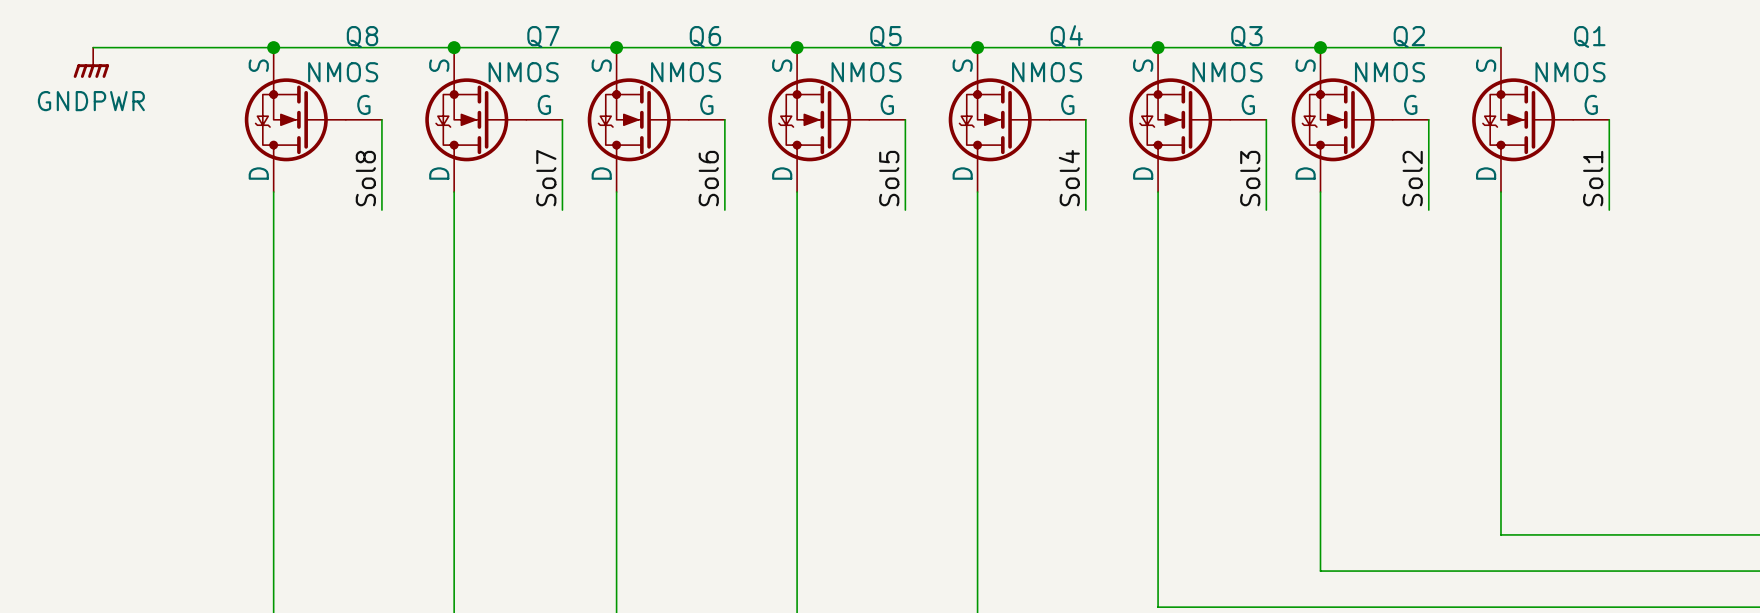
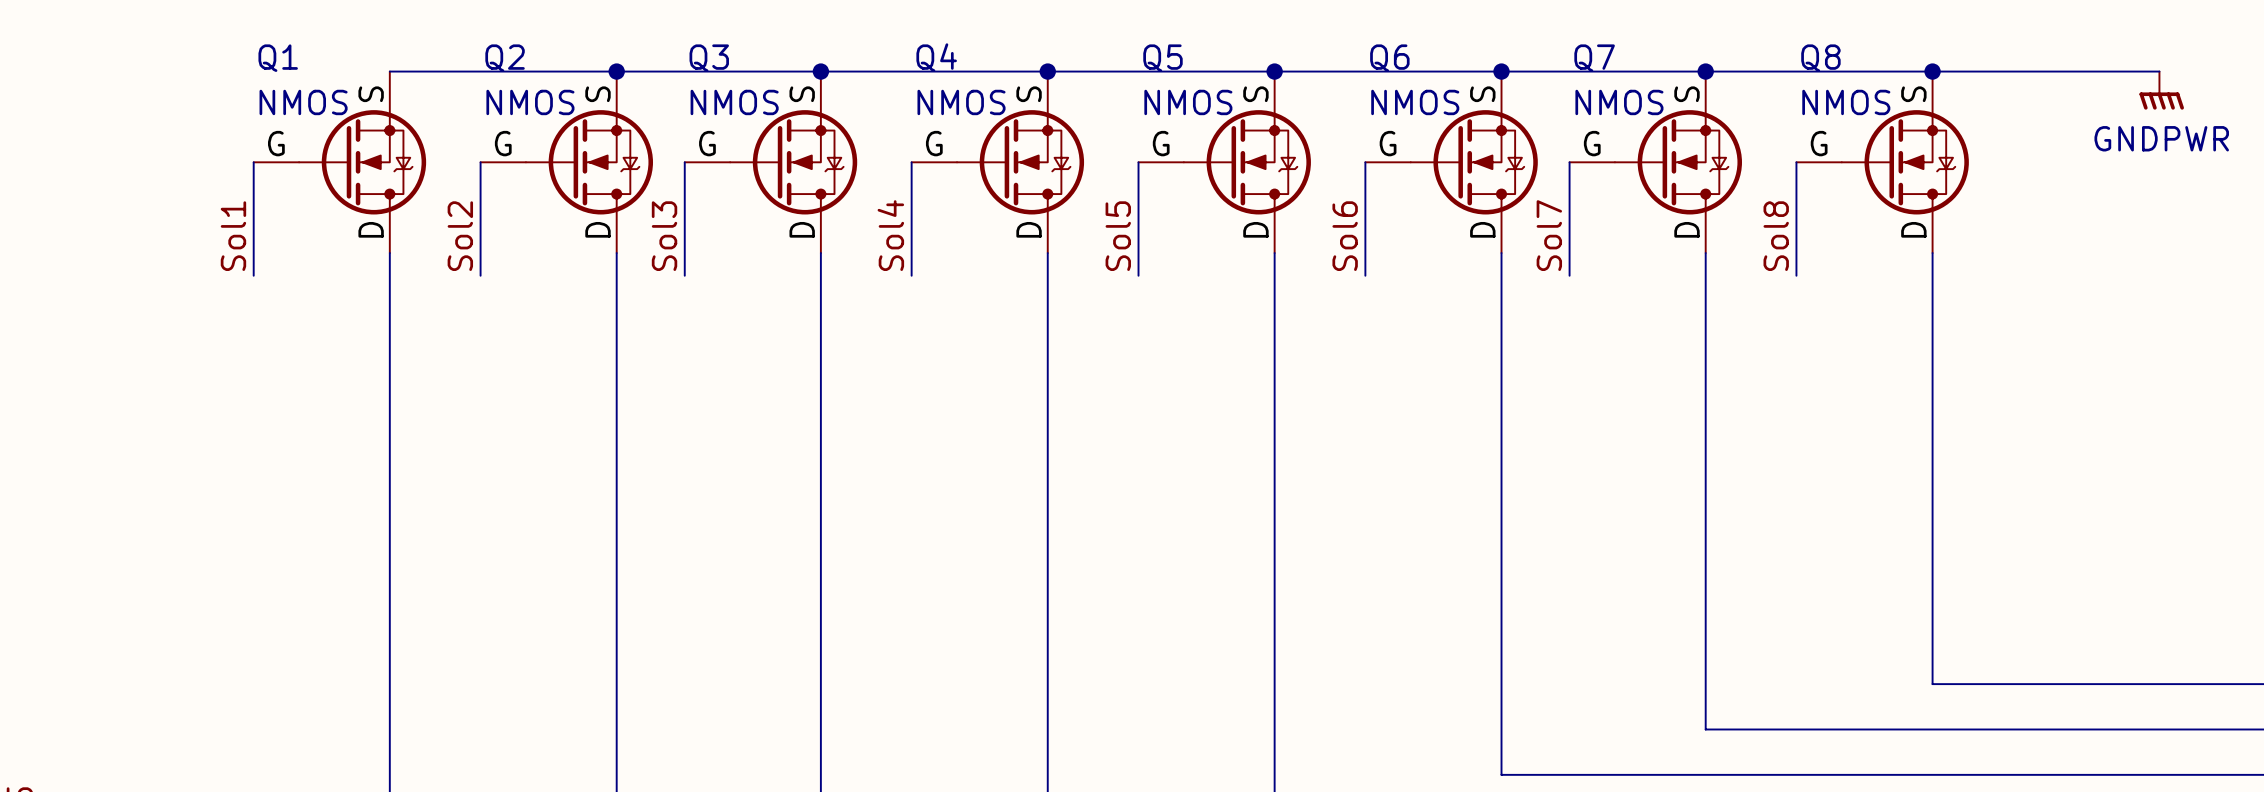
wire: (93, 47) (273, 47) -> none
junction: (273, 47) -> none
wire: none -> (1932, 71) (2159, 71)
junction: none -> (1932, 71)
power symbol: GNDPWR (91, 62) -> none
power symbol: none -> GNDPWR (2161, 90)
Q8 flip: as is (295, 119) -> left-right (1905, 162)
Q8 position: (313, 119) -> (1882, 162)
wire: (381, 119) (381, 210) -> (253, 162) (253, 275)
Q7 flip: as is (475, 119) -> left-right (1678, 162)
Q7 position: (493, 119) -> (1655, 162)
wire: (562, 119) (562, 210) -> (480, 162) (480, 275)
Q6 flip: as is (638, 119) -> left-right (1474, 162)
Q6 position: (656, 119) -> (1451, 162)
wire: (724, 119) (724, 210) -> (684, 162) (684, 275)
Q5 flip: as is (818, 119) -> left-right (1247, 162)
Q5 position: (836, 119) -> (1224, 162)
wire: (905, 119) (905, 210) -> (911, 162) (911, 275)
Q4 flip: as is (999, 119) -> left-right (1020, 162)
Q4 position: (1017, 119) -> (997, 162)
wire: (1085, 119) (1085, 210) -> (1138, 162) (1138, 275)
Q3 flip: as is (1179, 119) -> left-right (793, 162)
Q3 position: (1197, 119) -> (770, 162)
wire: (1266, 119) (1266, 210) -> (1365, 162) (1365, 275)
Q2 flip: as is (1342, 119) -> left-right (589, 162)
Q2 position: (1360, 119) -> (566, 162)
wire: (1428, 119) (1428, 210) -> (1569, 162) (1569, 275)
Q1 flip: as is (1522, 119) -> left-right (362, 162)
Q1 position: (1540, 119) -> (339, 162)
wire: (1609, 119) (1609, 210) -> (1796, 162) (1796, 275)
label: none -> Sol1 (233, 236)
label: Sol8 (365, 178) -> Sol2 (460, 236)
label: none -> Sol3 (664, 236)
label: Sol7 (546, 178) -> none
label: none -> Sol4 (890, 235)
label position: Sol6 (708, 178) -> Sol6 (1345, 236)
label position: Sol5 (889, 178) -> Sol5 (1118, 236)
label: Sol4 (1069, 178) -> none
label: none -> Sol7 (1549, 235)
label: Sol3 (1250, 178) -> none
label: Sol2 (1412, 178) -> Sol8 (1776, 236)
label: Sol1 (1593, 178) -> none

